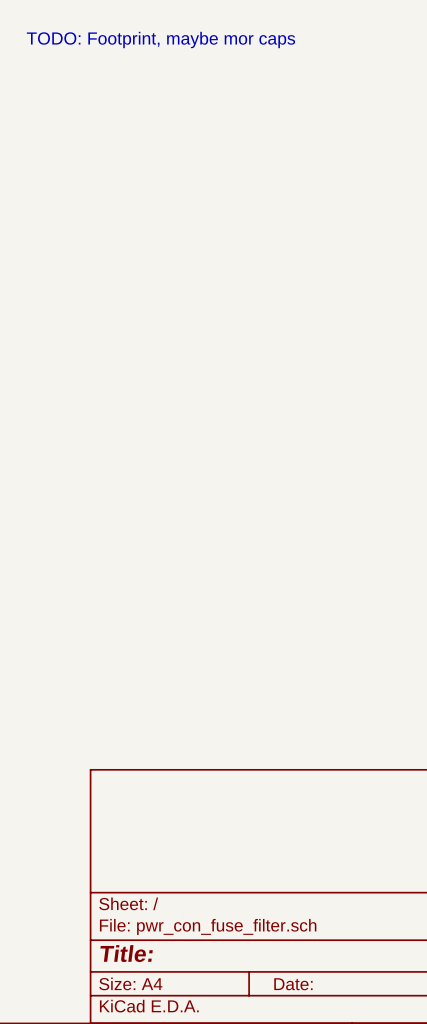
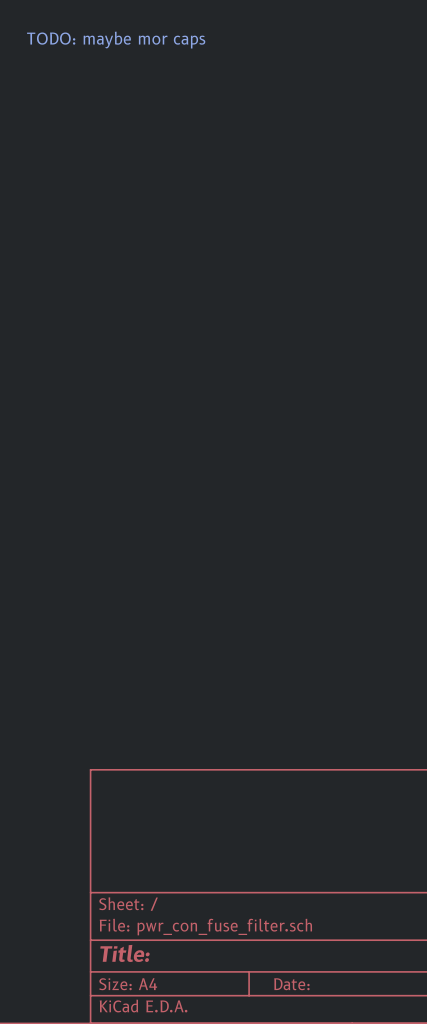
text: TODO: Footprint, maybe mor caps (160, 39) -> TODO: maybe mor caps (116, 40)

